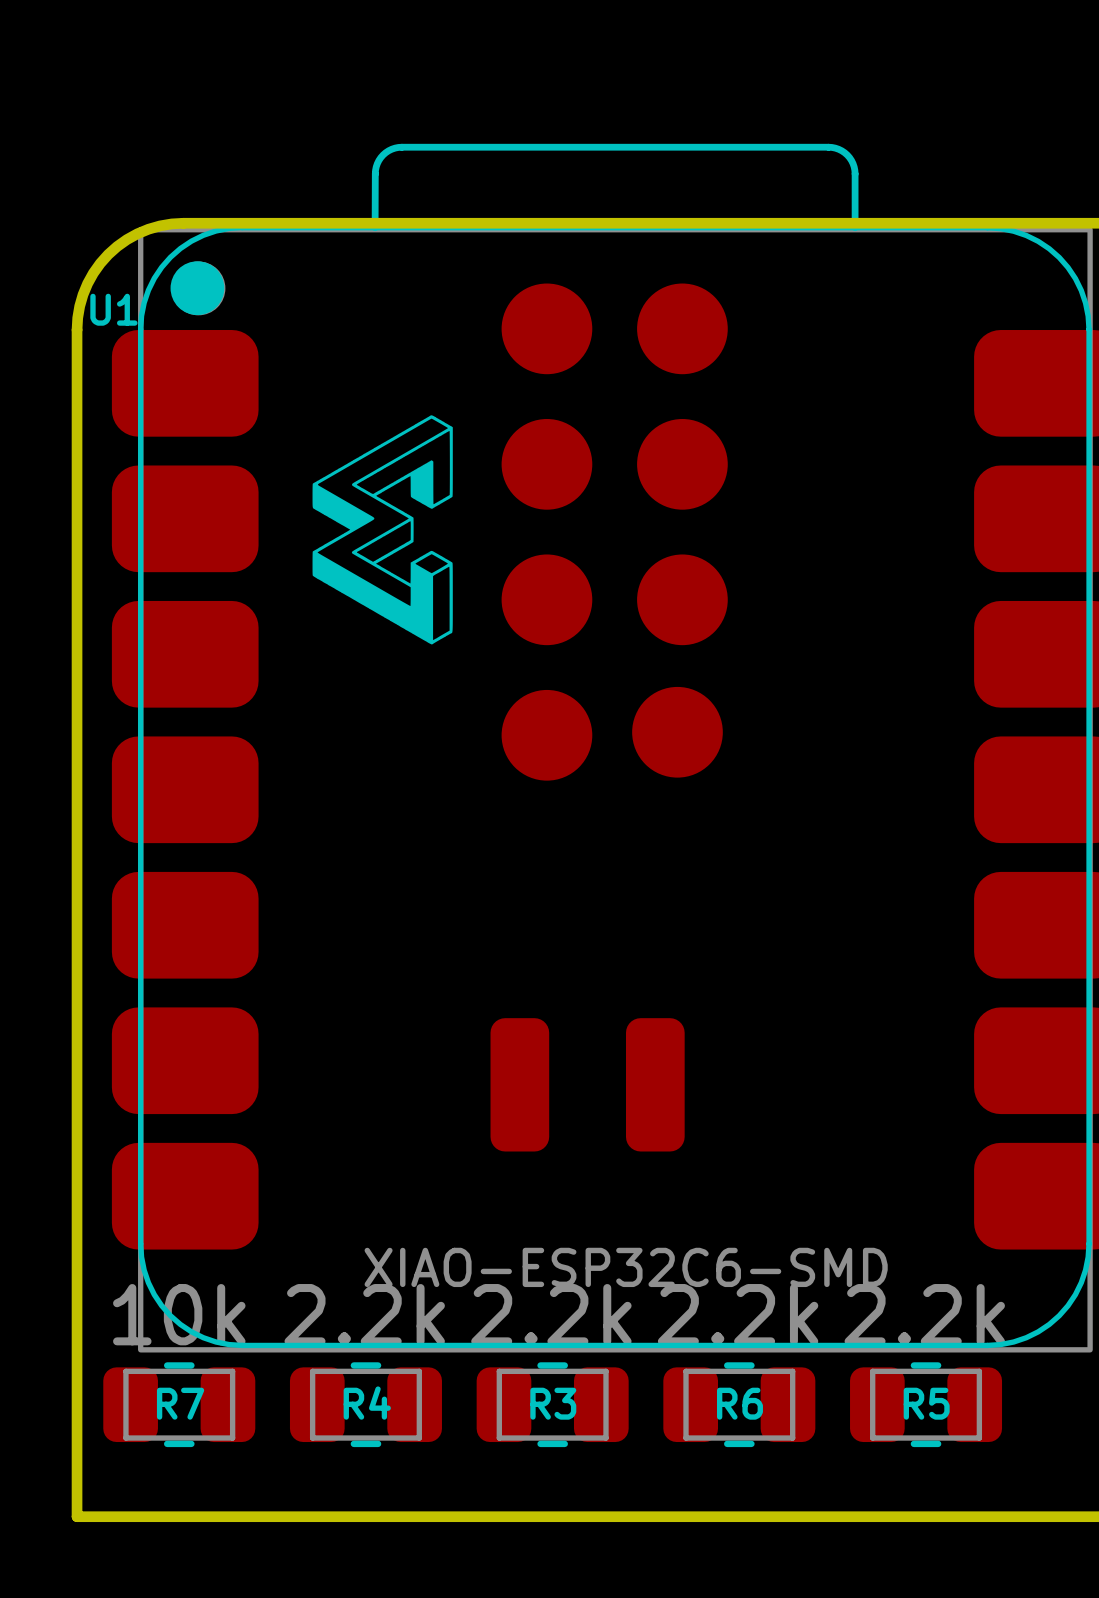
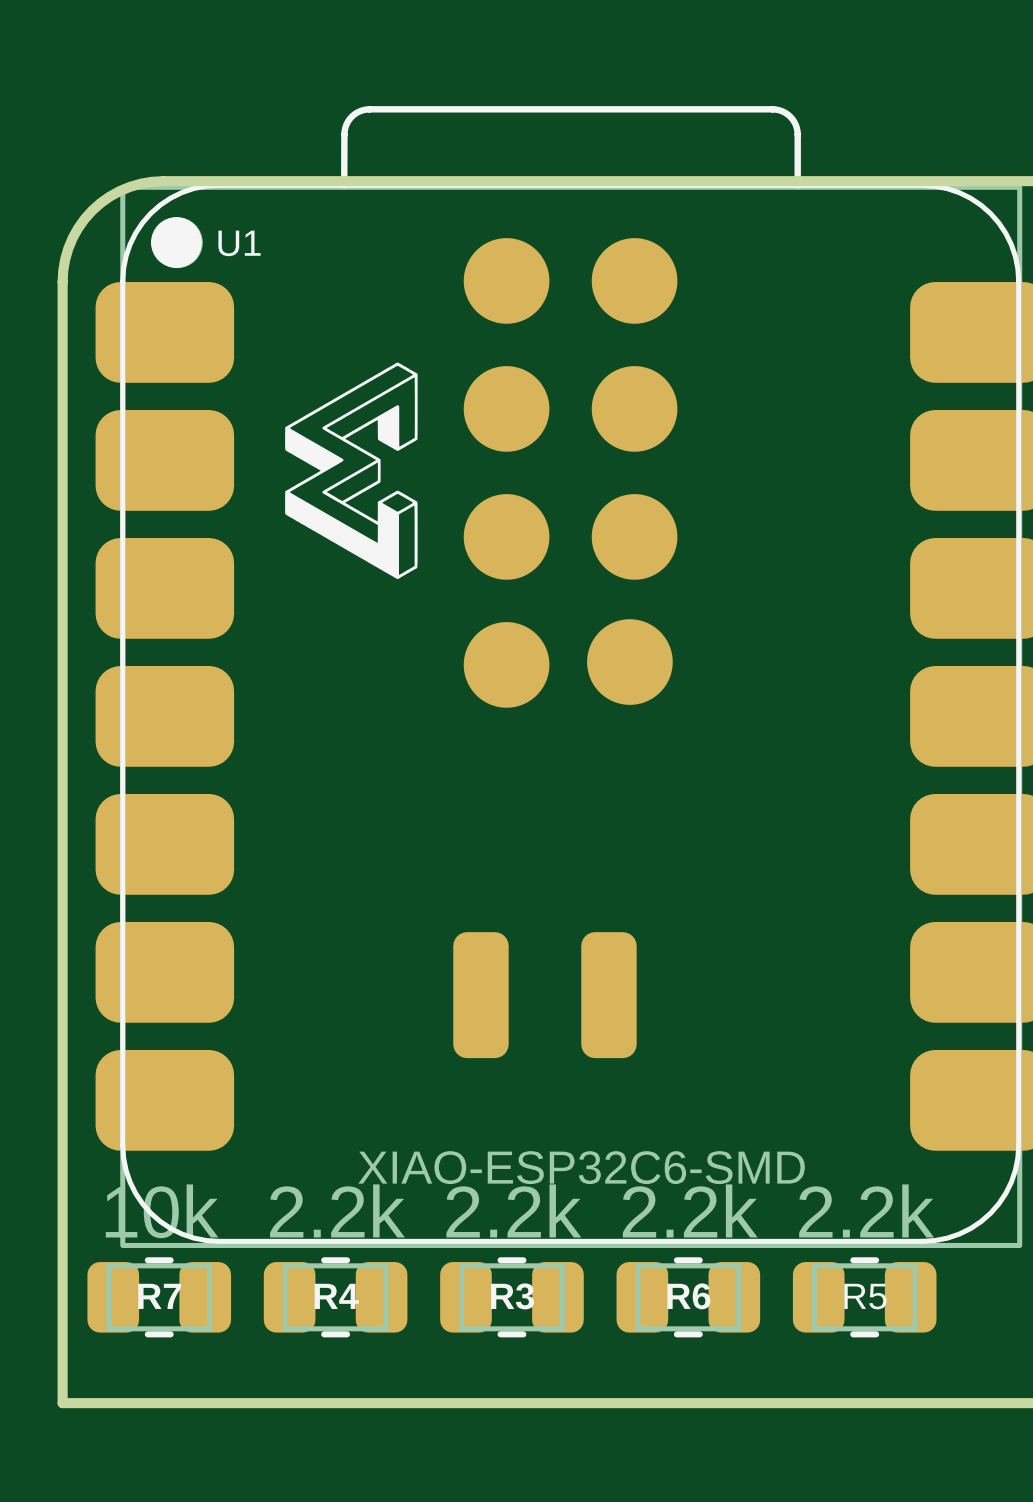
U1 name position: U1 (113, 309) -> U1 (239, 243)

